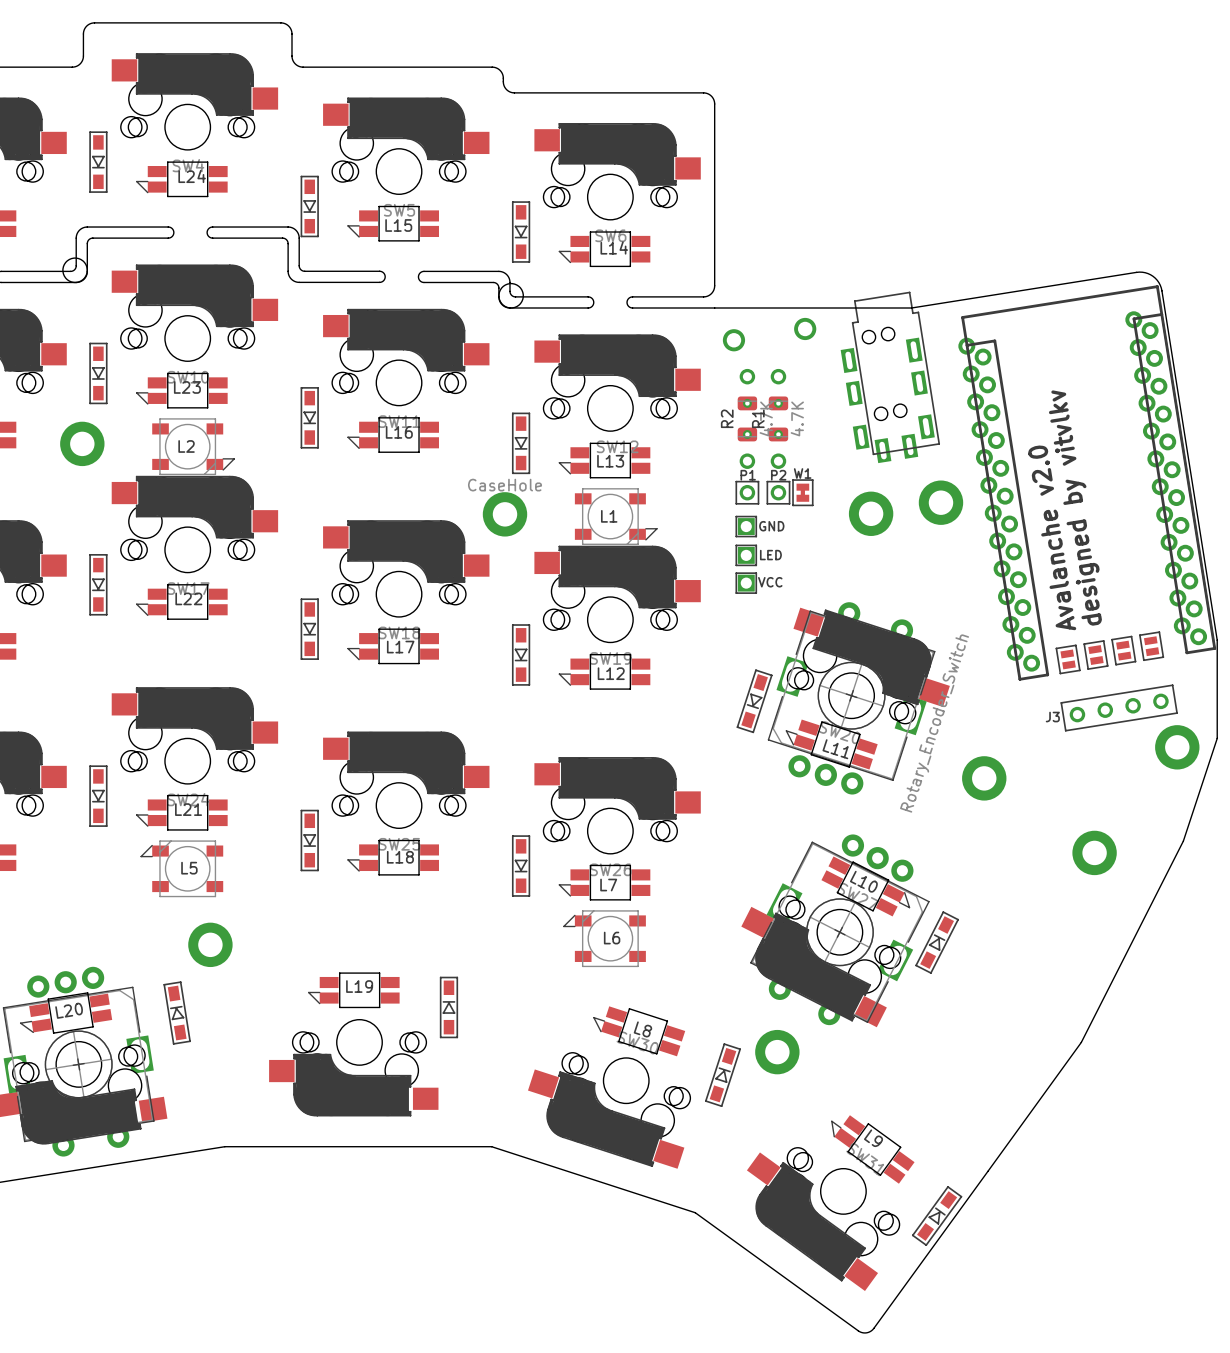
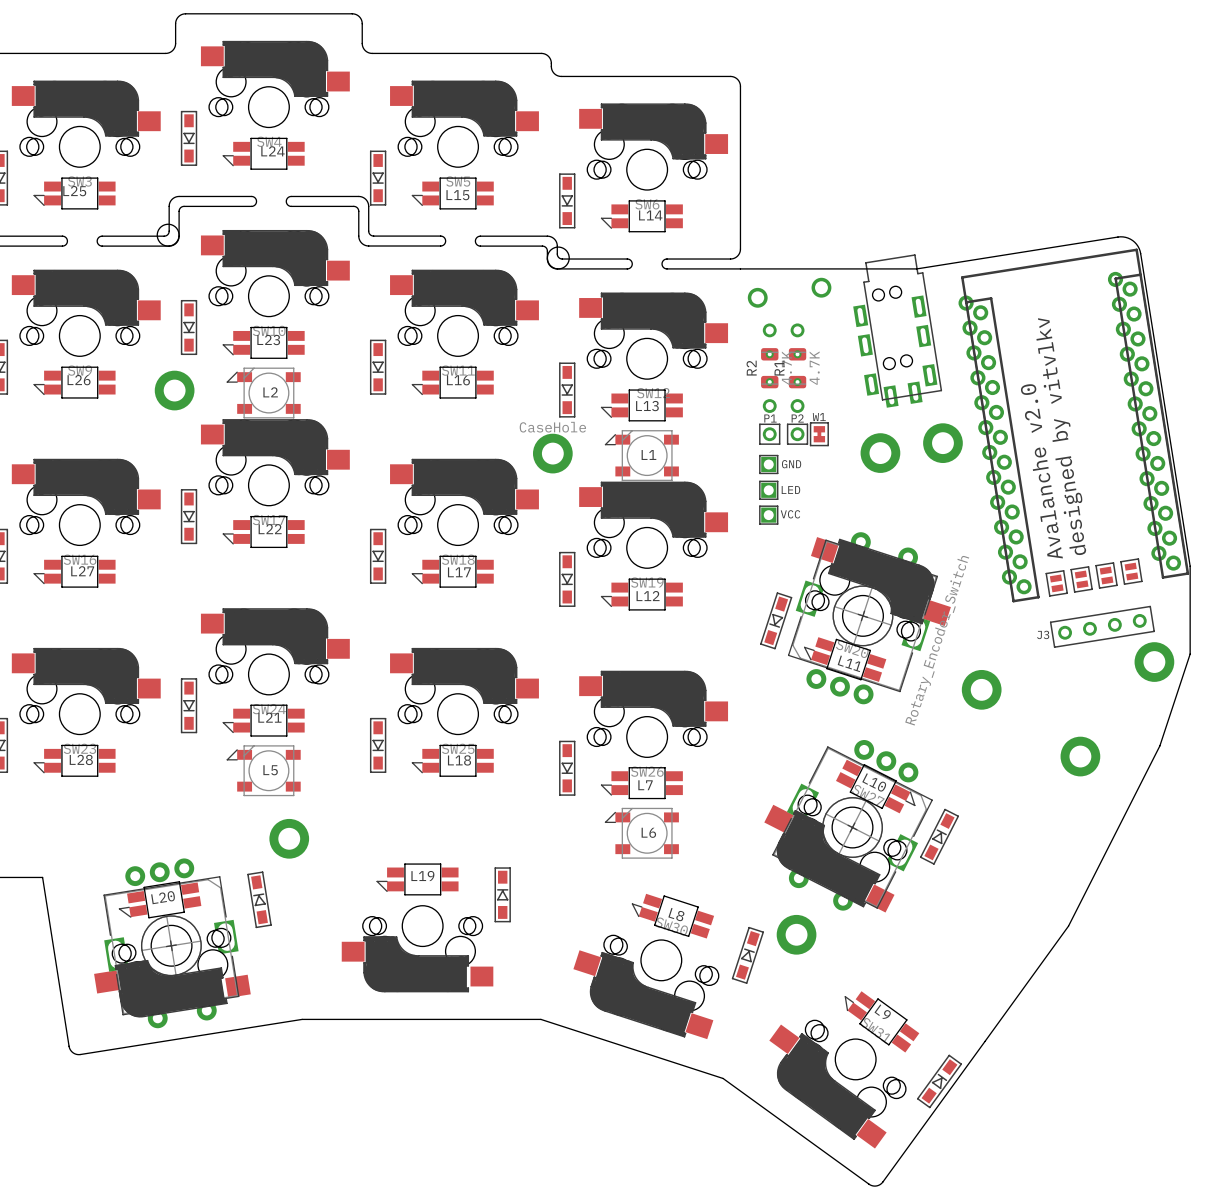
L2 rotation: 0° (193, 446) -> 180° (263, 393)
L1 rotation: 0° (616, 516) -> 180° (641, 455)

